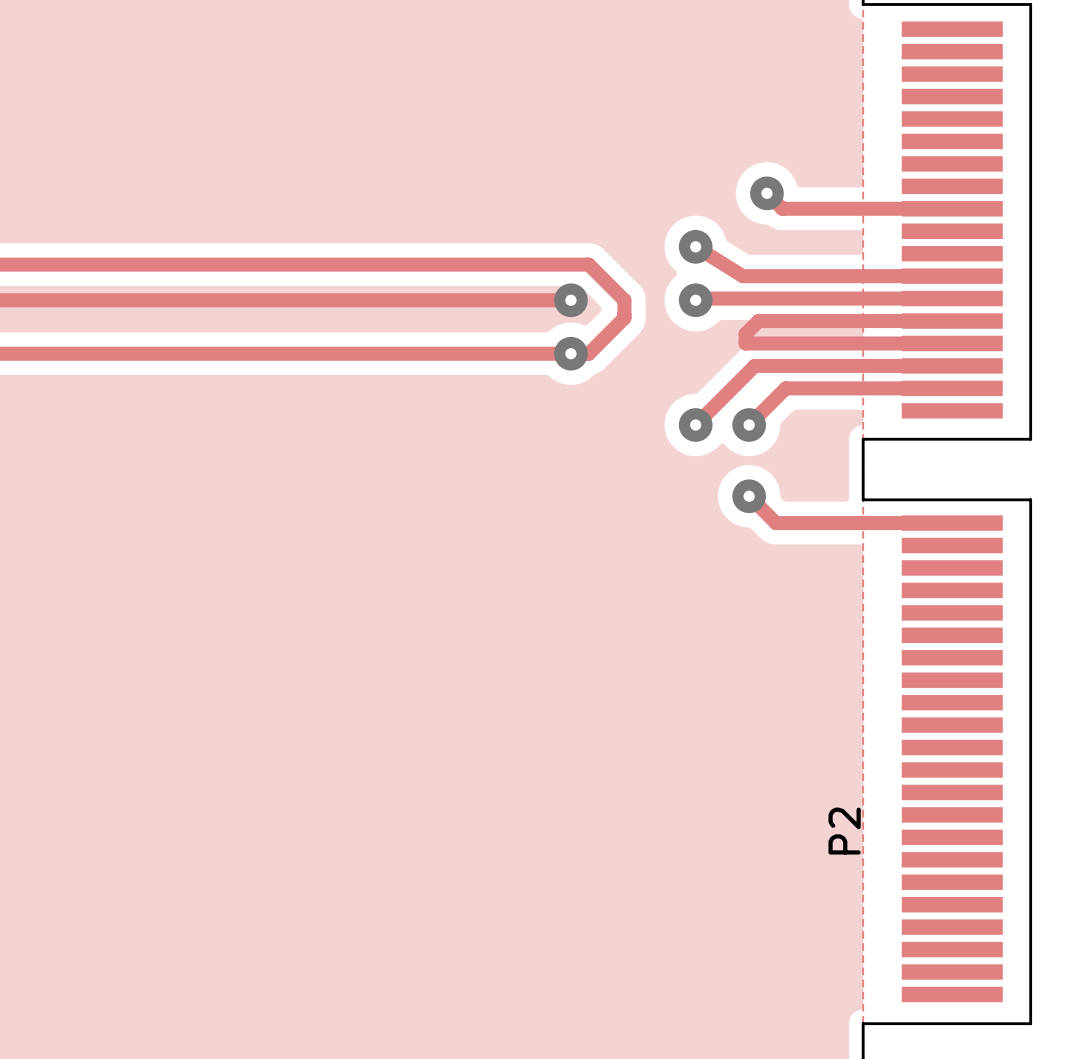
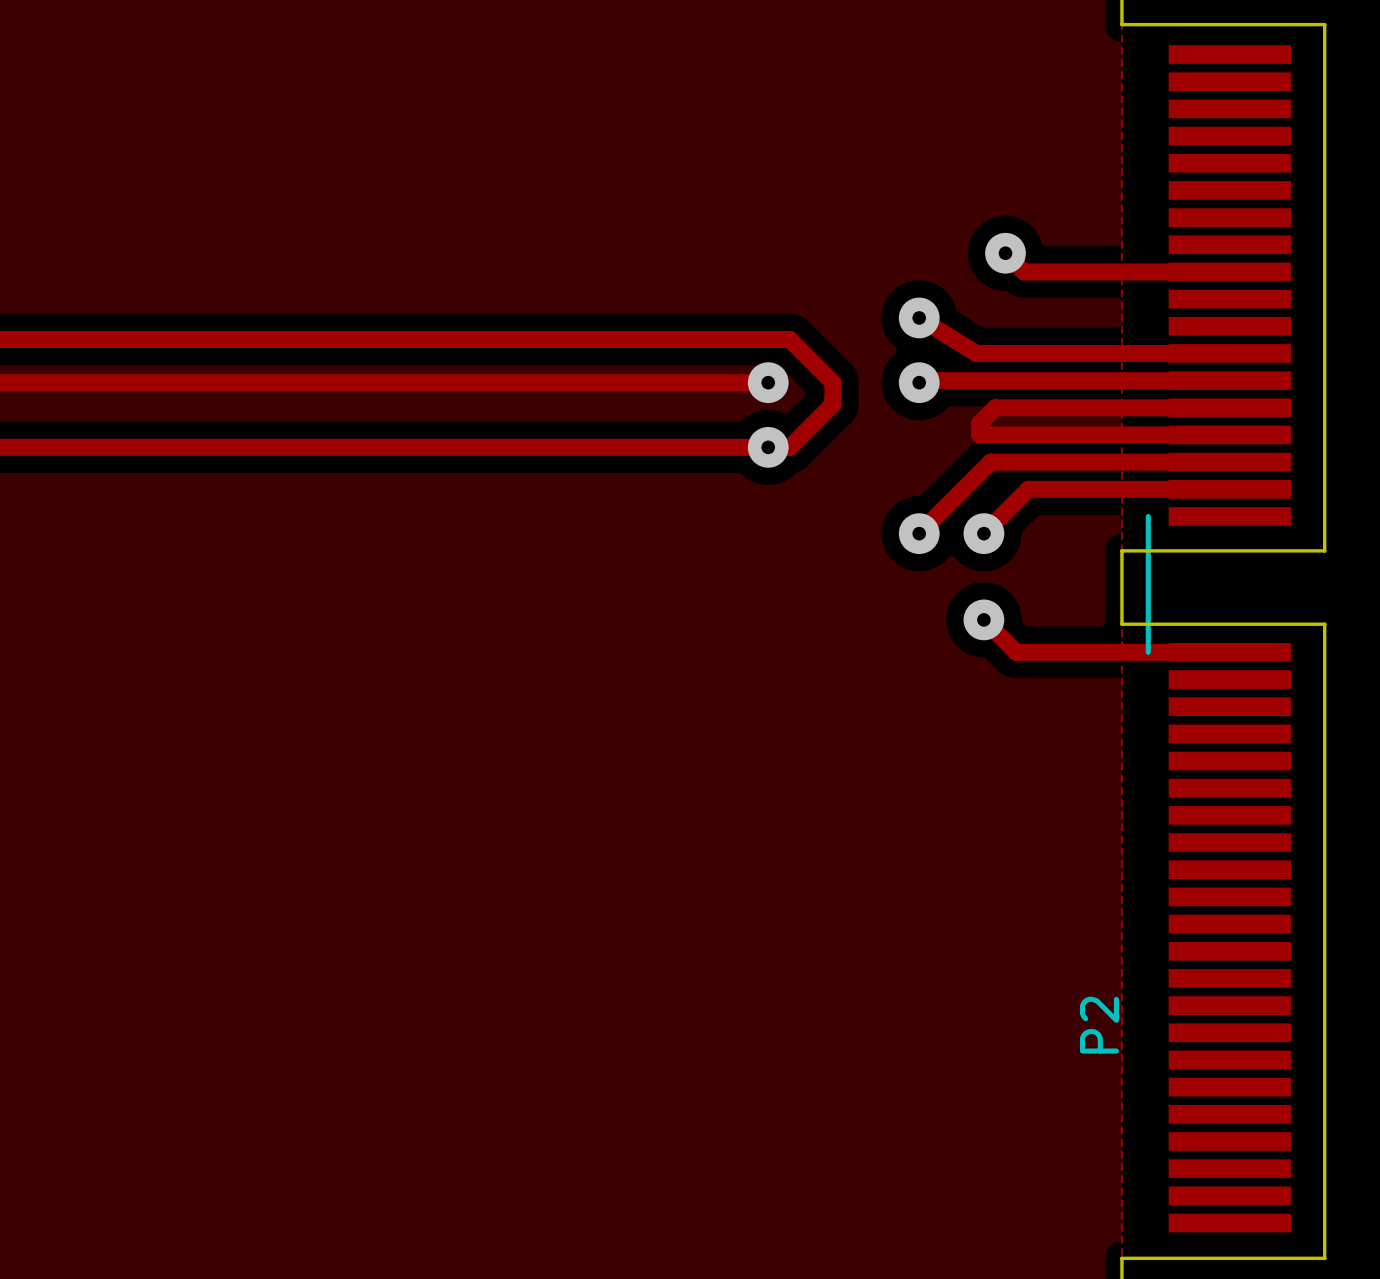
P2 footprint: [901, 21, 1003, 1003] -> [1145, 45, 1291, 1233]

